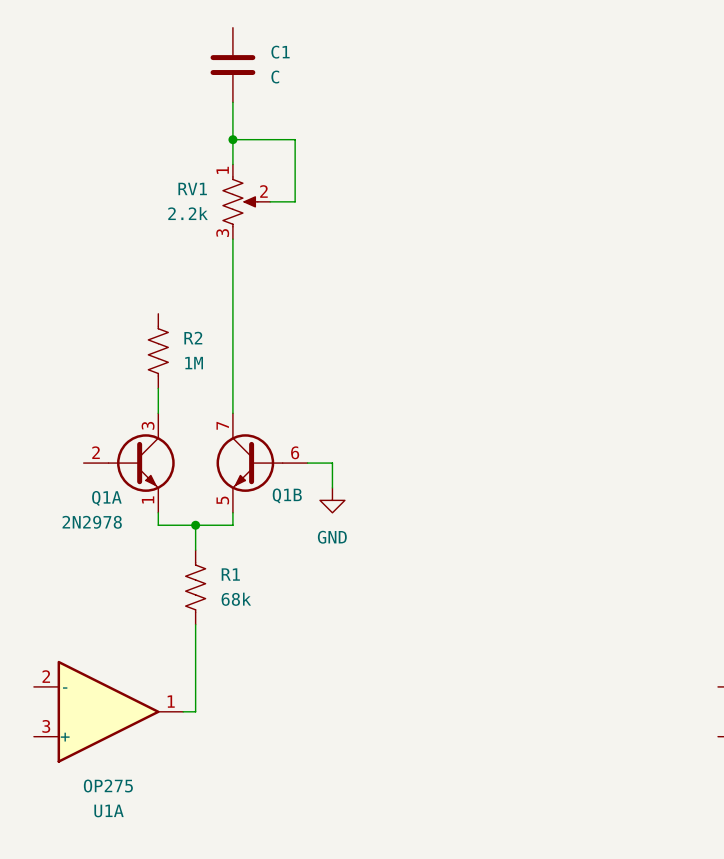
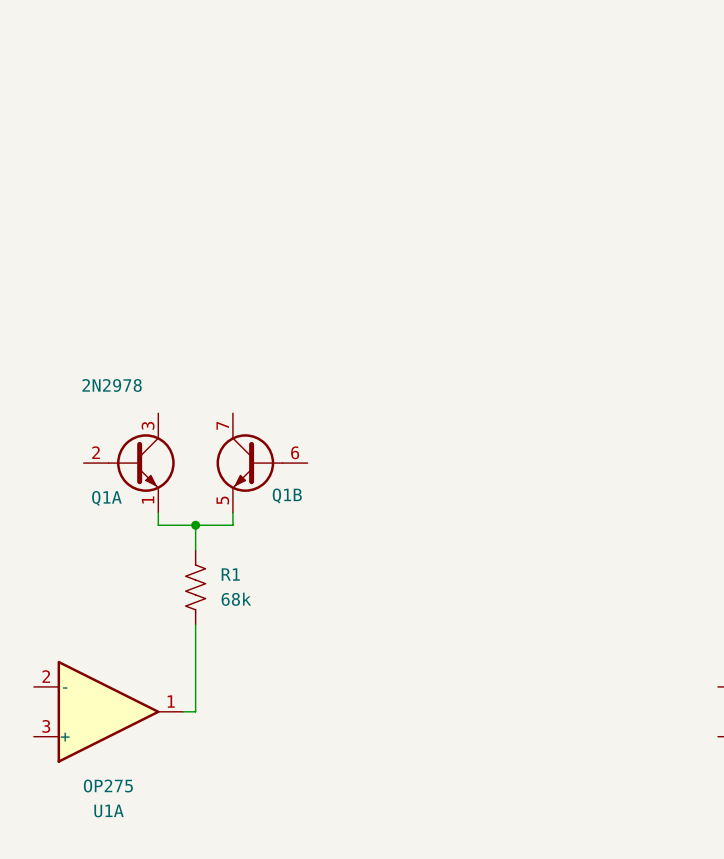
C1: C (232, 65) -> none
wire: (232, 102) (232, 164) -> none
wire: (232, 139) (295, 139) (295, 201) (270, 201) -> none
junction: (232, 139) -> none
RV1: 2.2k (246, 201) -> none
wire: (232, 239) (232, 413) -> none
R2: 1M (158, 351) -> none
wire: (158, 388) (158, 413) -> none
wire: (307, 463) (332, 463) (332, 487) -> none
power symbol: GND (332, 500) -> none
Q1A value position: 2N2978 (92, 522) -> 2N2978 (112, 385)

